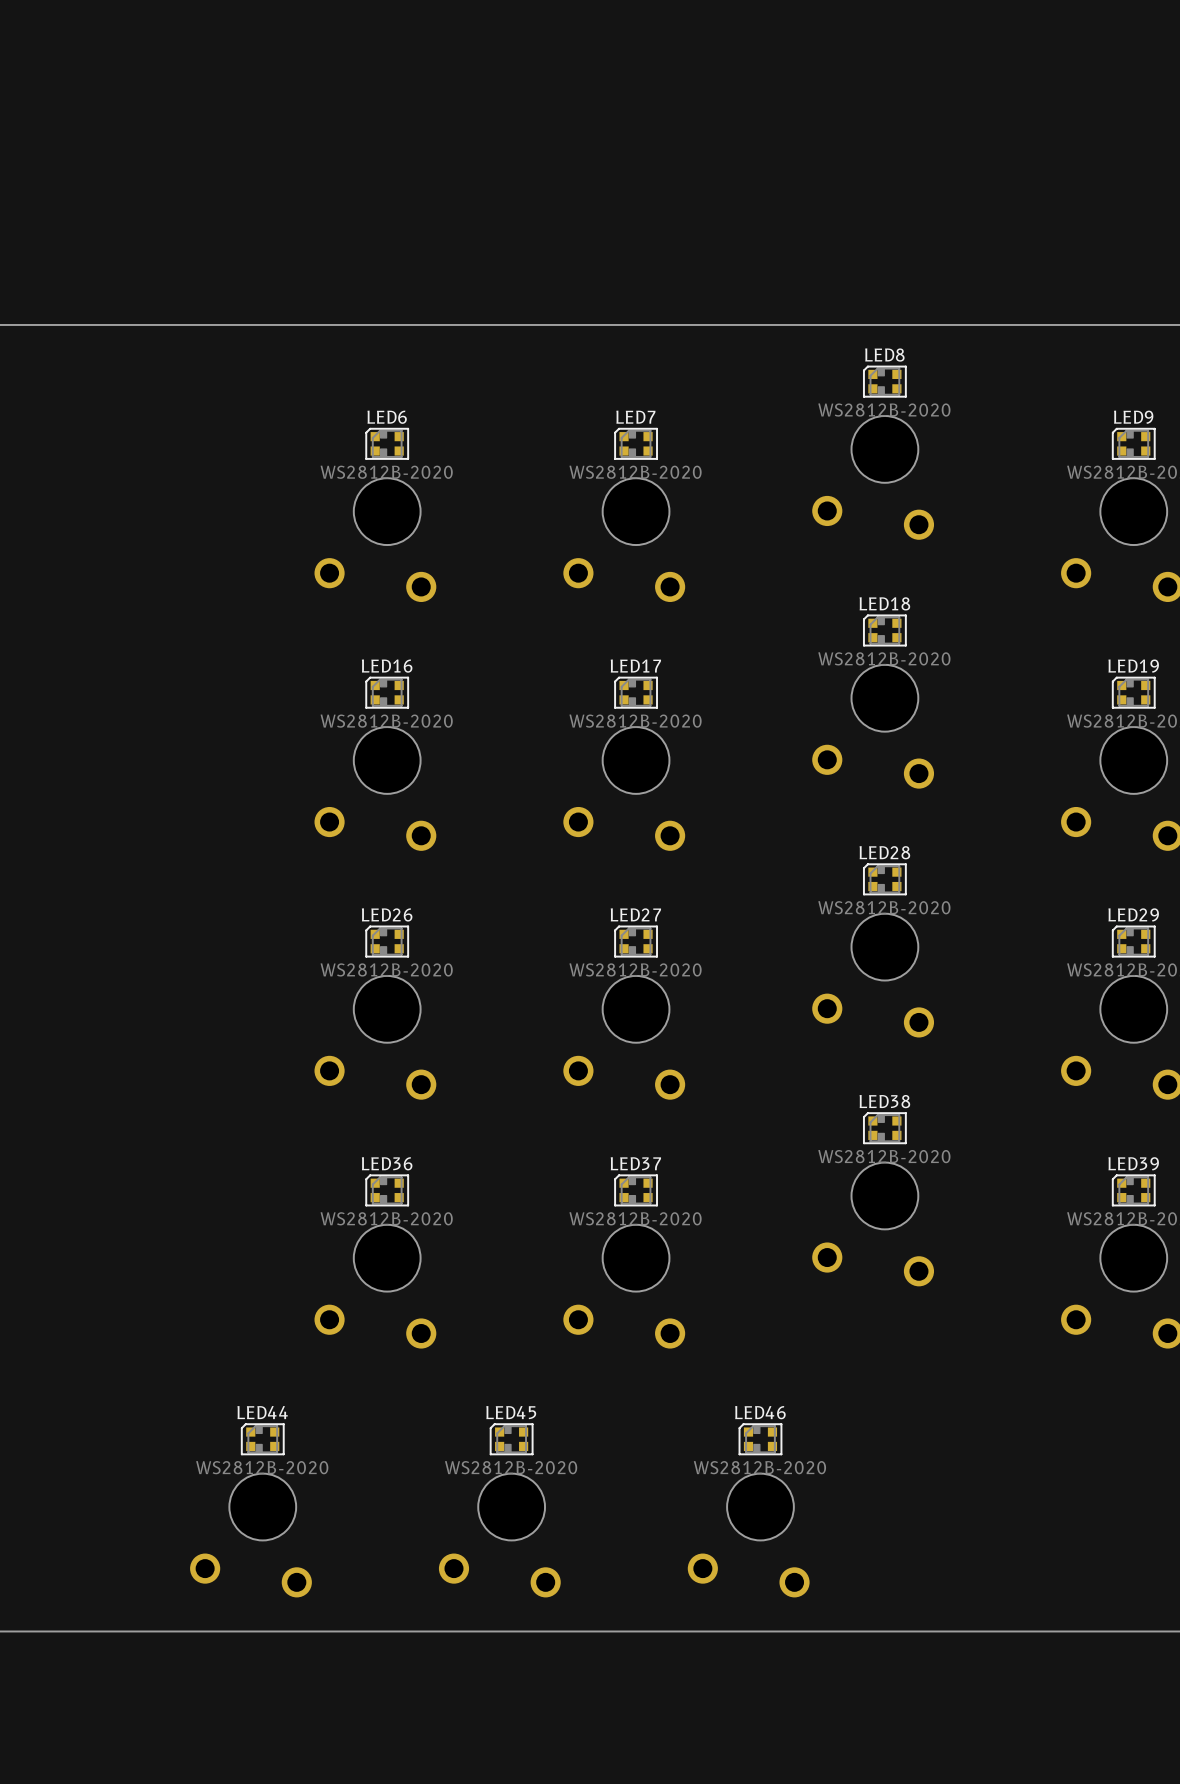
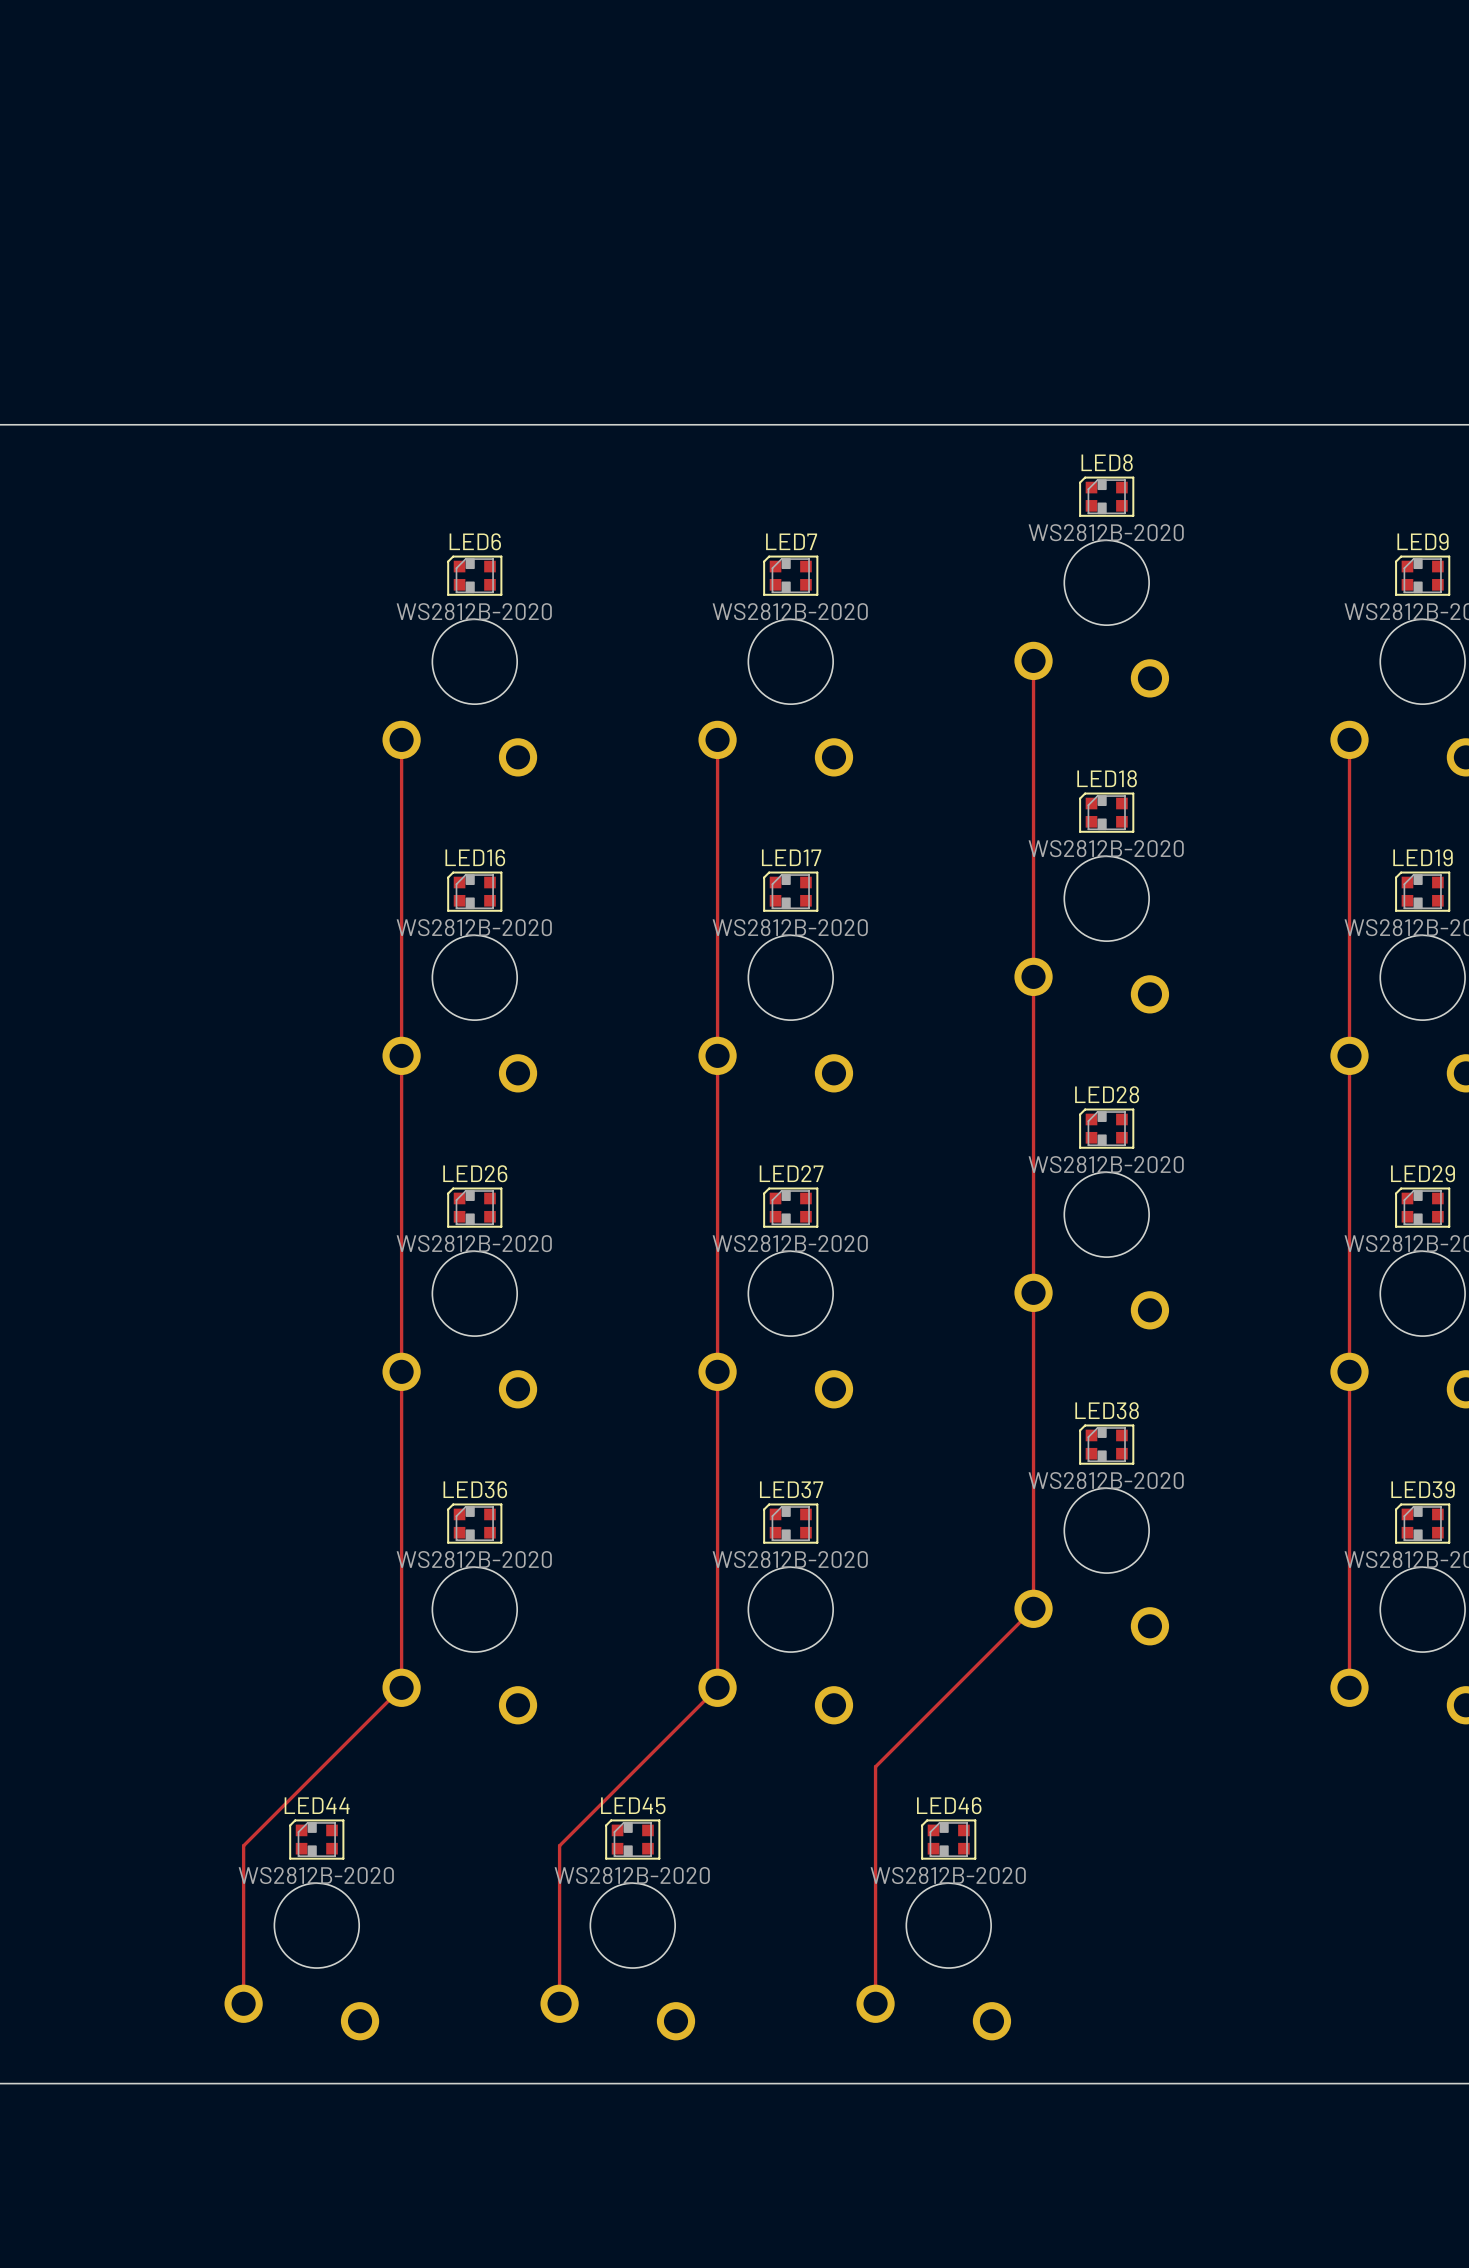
track: none -> (1033, 660) (1033, 1608) (875, 1766) (875, 2003)
track: none -> (401, 739) (401, 1687) (243, 1845) (243, 2003)
track: none -> (717, 739) (717, 1687) (559, 1845) (559, 2003)
track: none -> (1349, 739) (1349, 1687)

